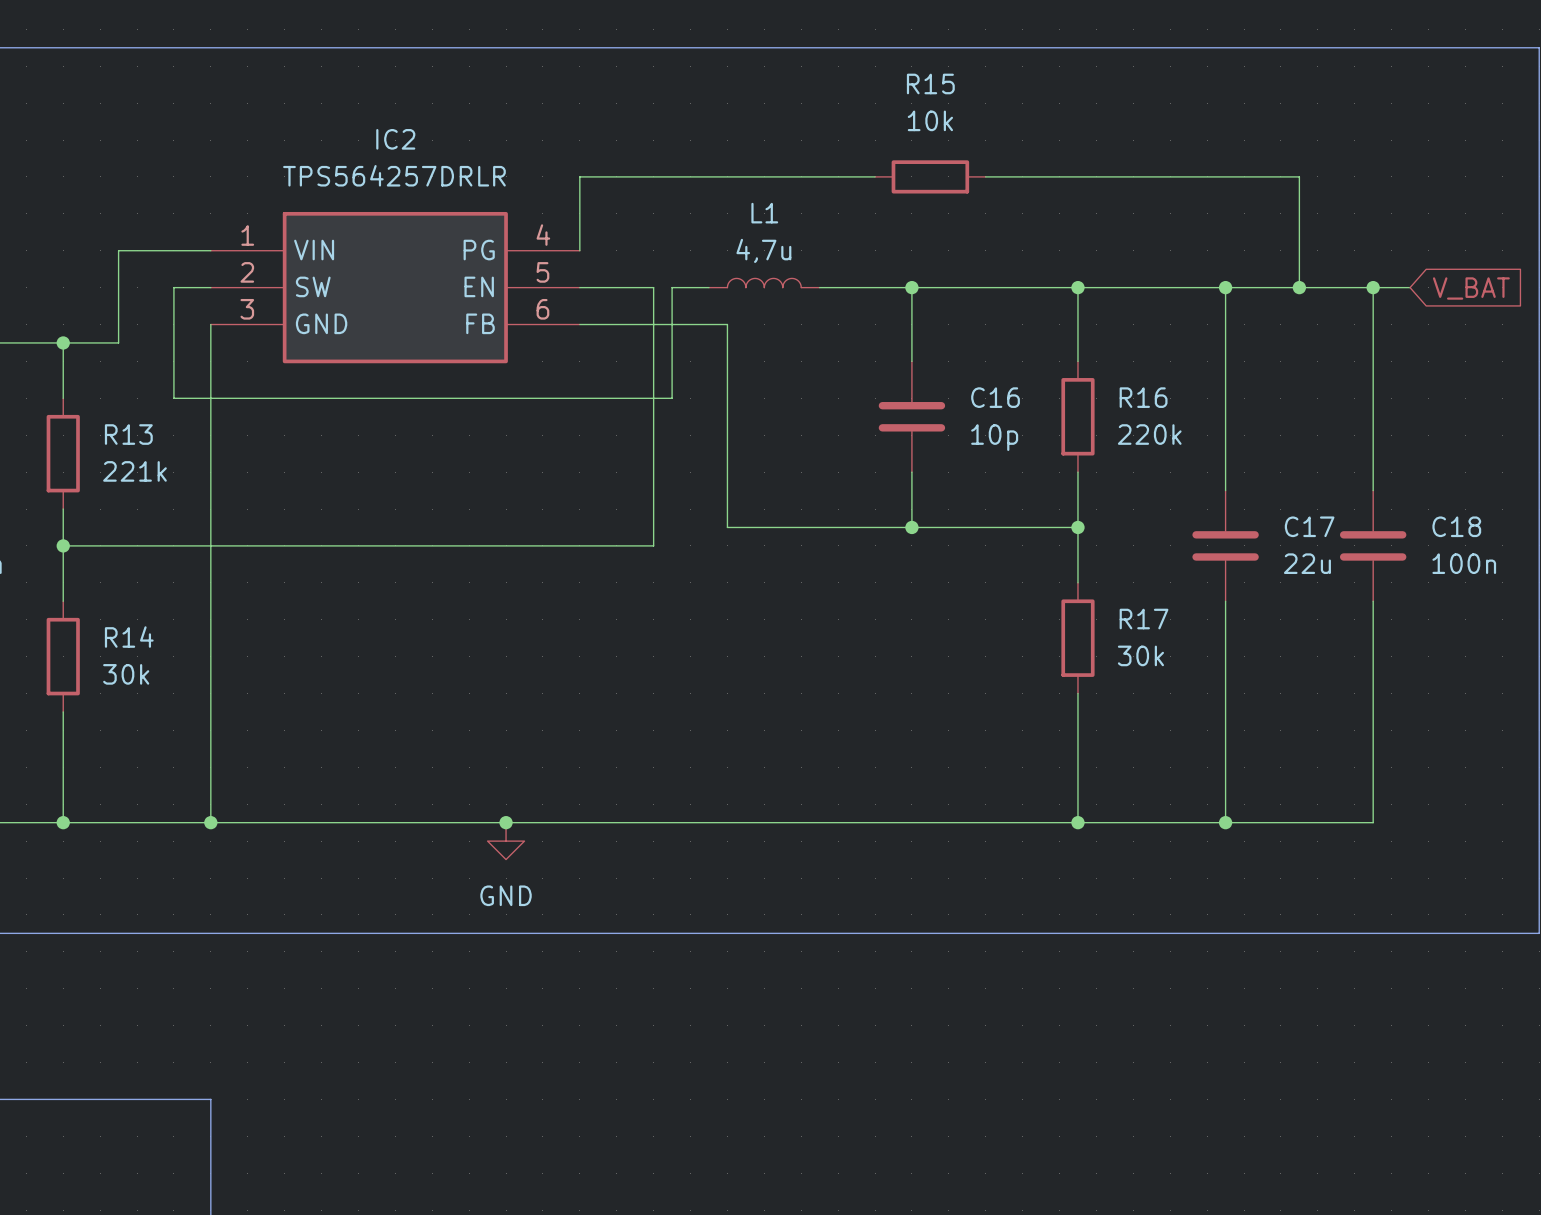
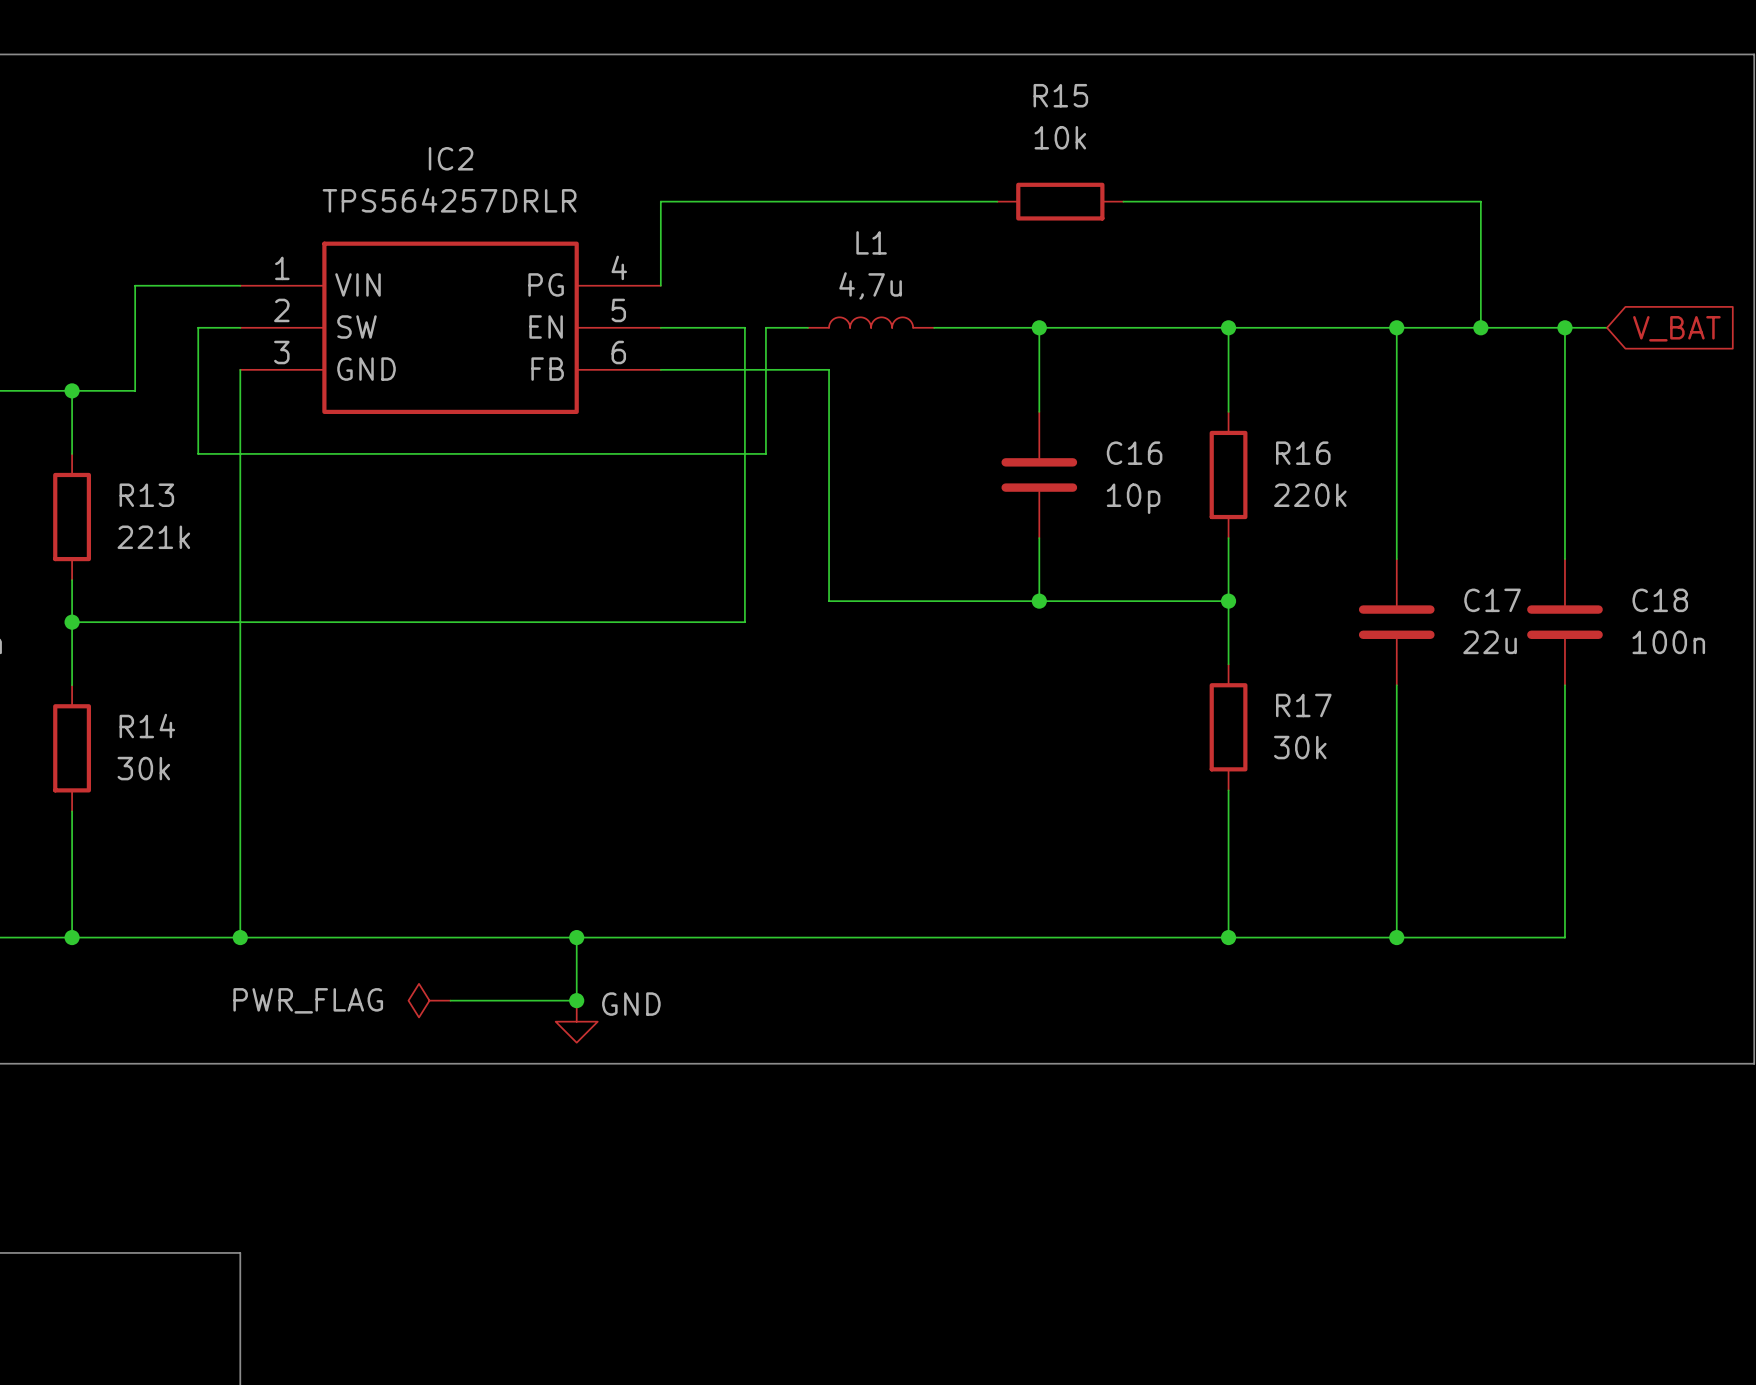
wire: none -> (576, 937) (576, 1000) (450, 1000)
power symbol position: GND (506, 841) -> GND (576, 1021)
power symbol: none -> PWR_FLAG (429, 1000)
junction: none -> (576, 1000)
power symbol text position: GND (506, 895) -> GND (631, 1004)

